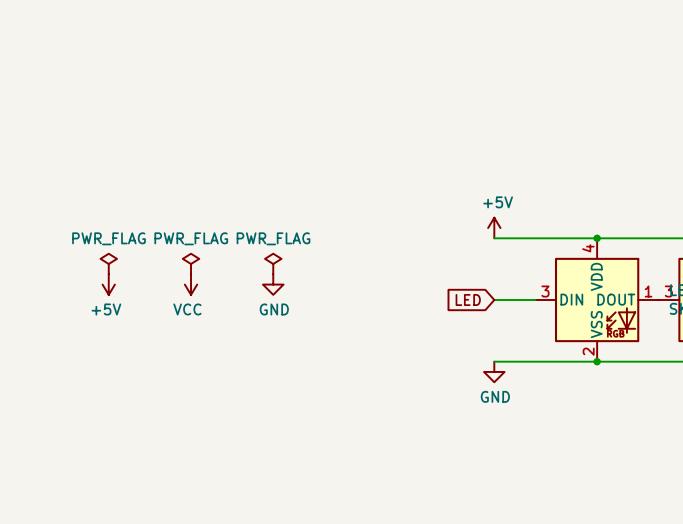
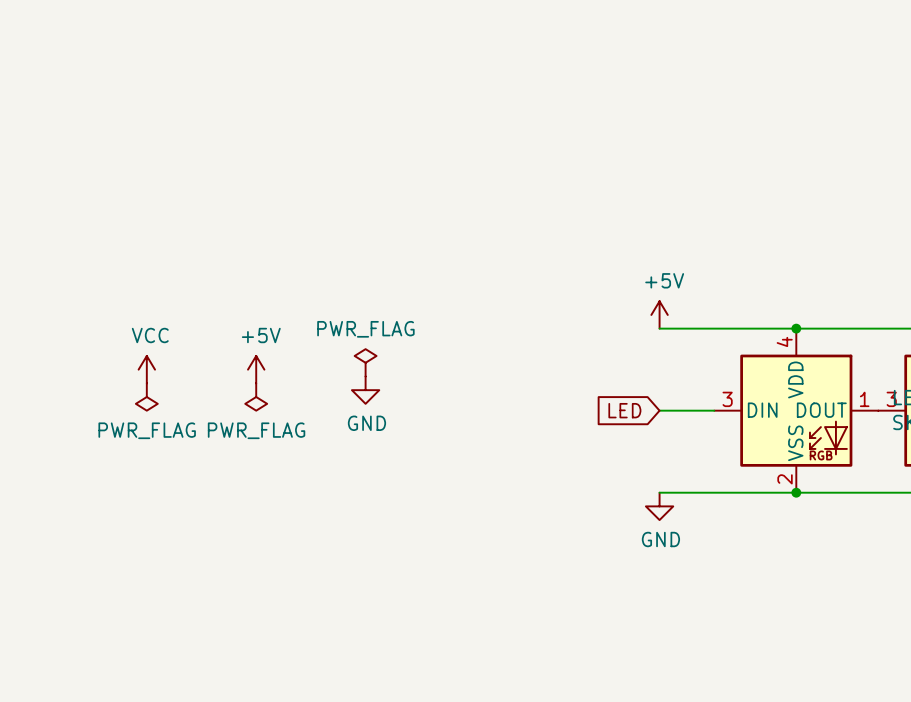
power symbol: PWR_FLAG (108, 264) -> VCC (146, 369)
power symbol: PWR_FLAG (191, 264) -> +5V (256, 369)
power symbol: +5V (108, 284) -> PWR_FLAG (146, 396)
power symbol: VCC (191, 284) -> PWR_FLAG (256, 396)

